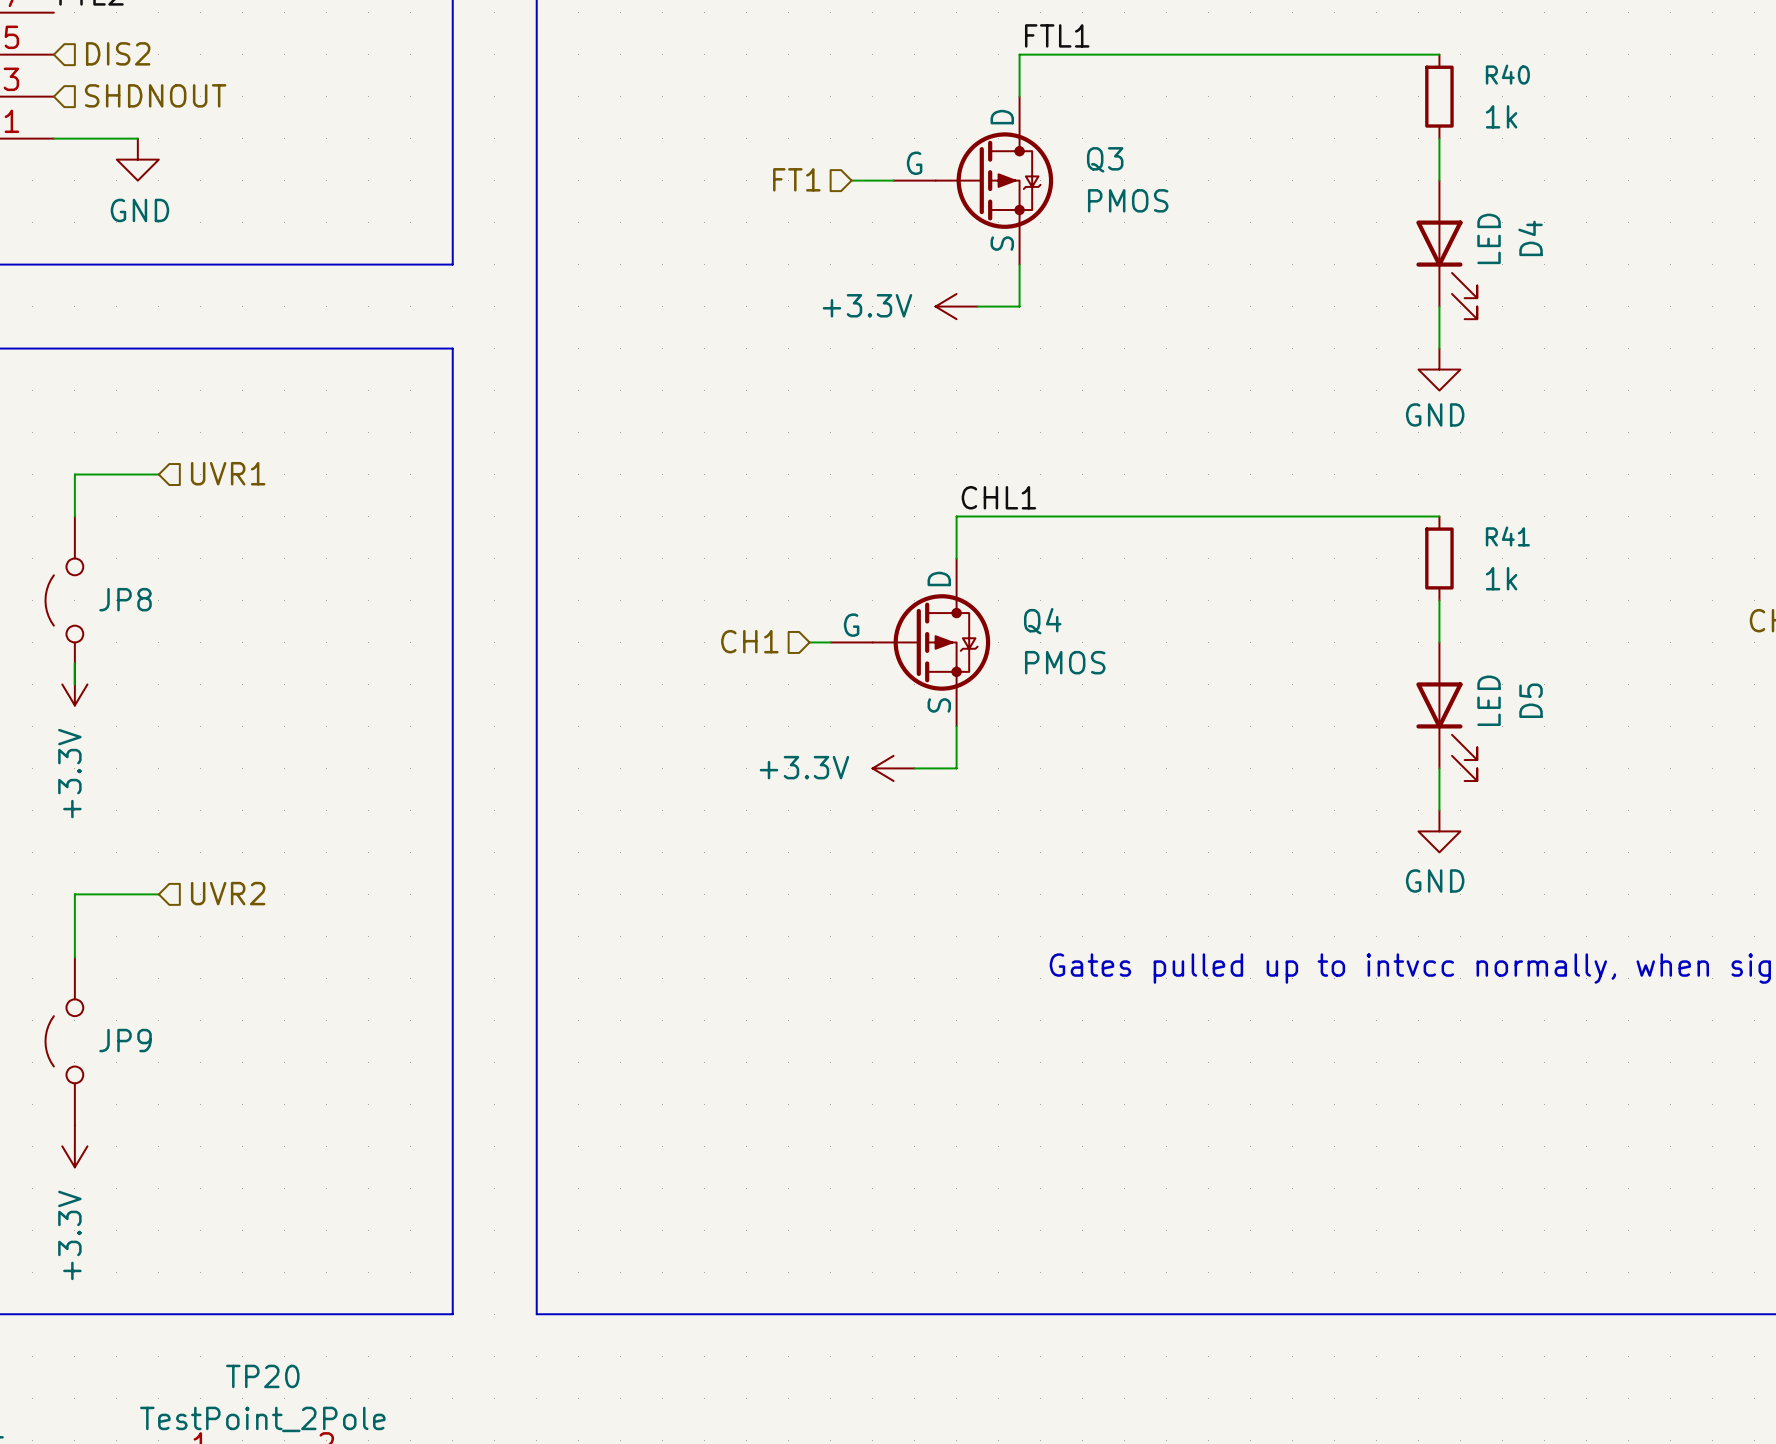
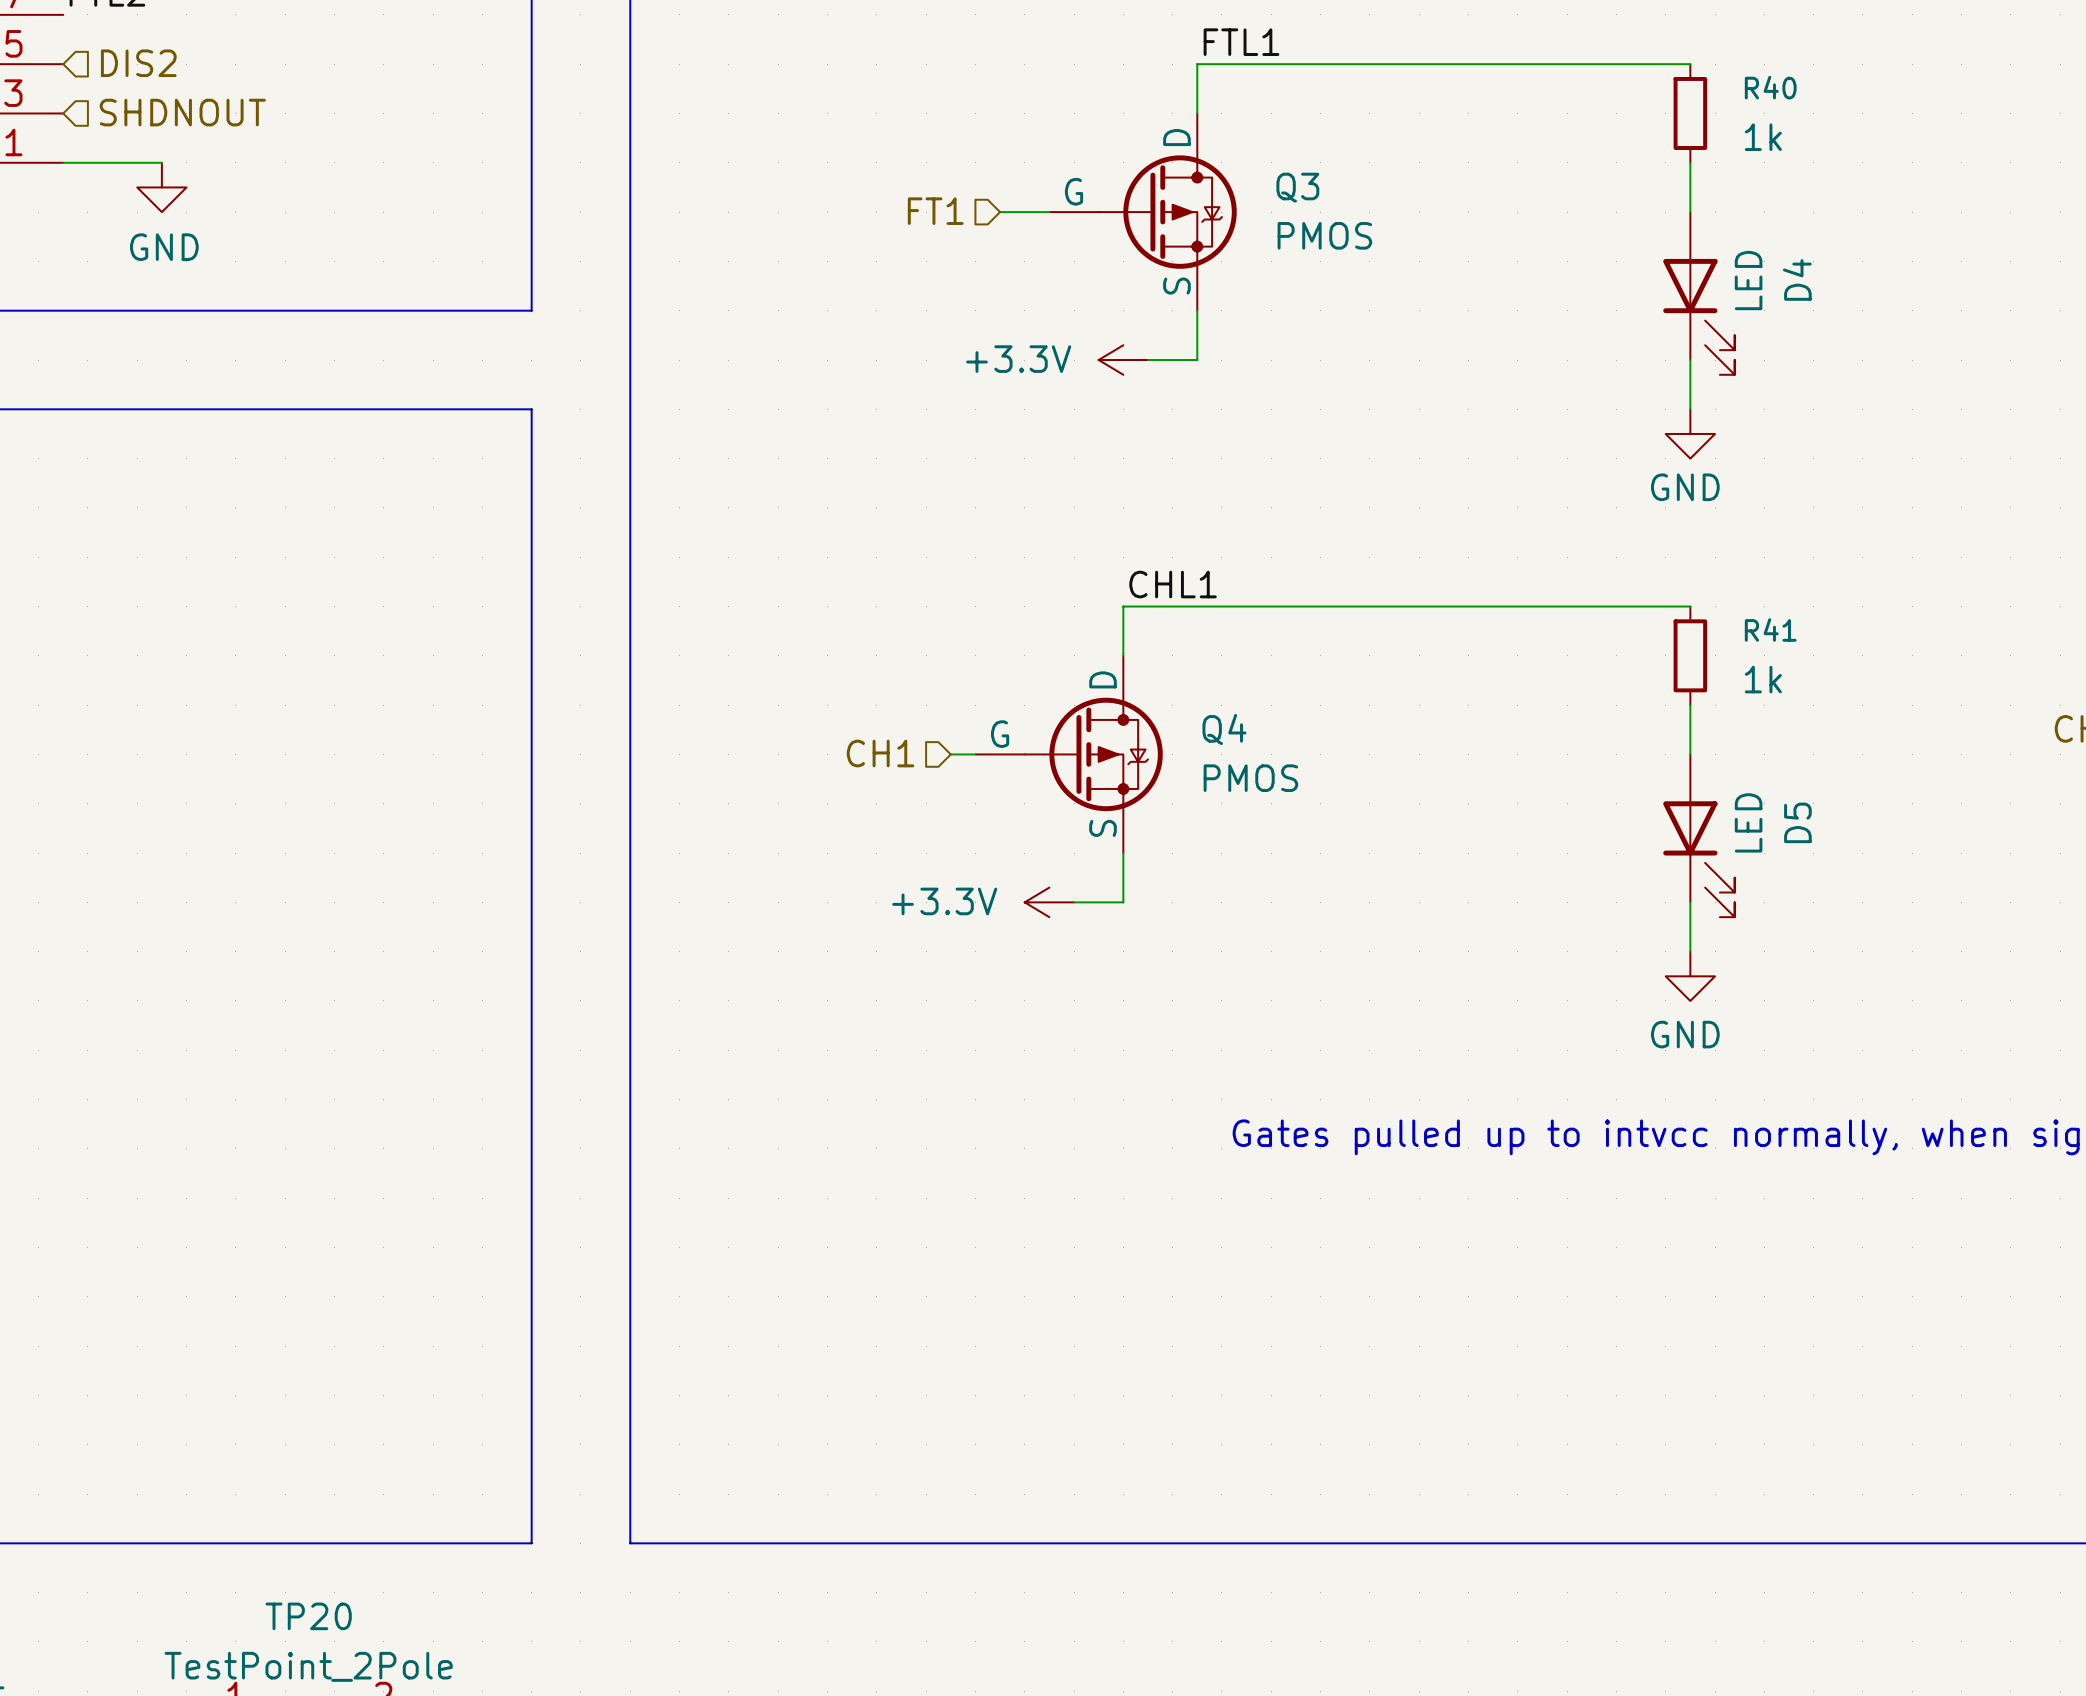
hierarchical label: UVR1 (228, 473) -> none
wire: (158, 474) (74, 474) (74, 516) -> none
JP8: (64, 600) -> none
wire: (74, 663) (74, 684) -> none
power symbol: +3.3V (74, 684) -> none
hierarchical label: UVR2 (228, 893) -> none
wire: (158, 894) (74, 894) (74, 957) -> none
JP9: (64, 1041) -> none
power symbol: +3.3V (74, 1146) -> none

